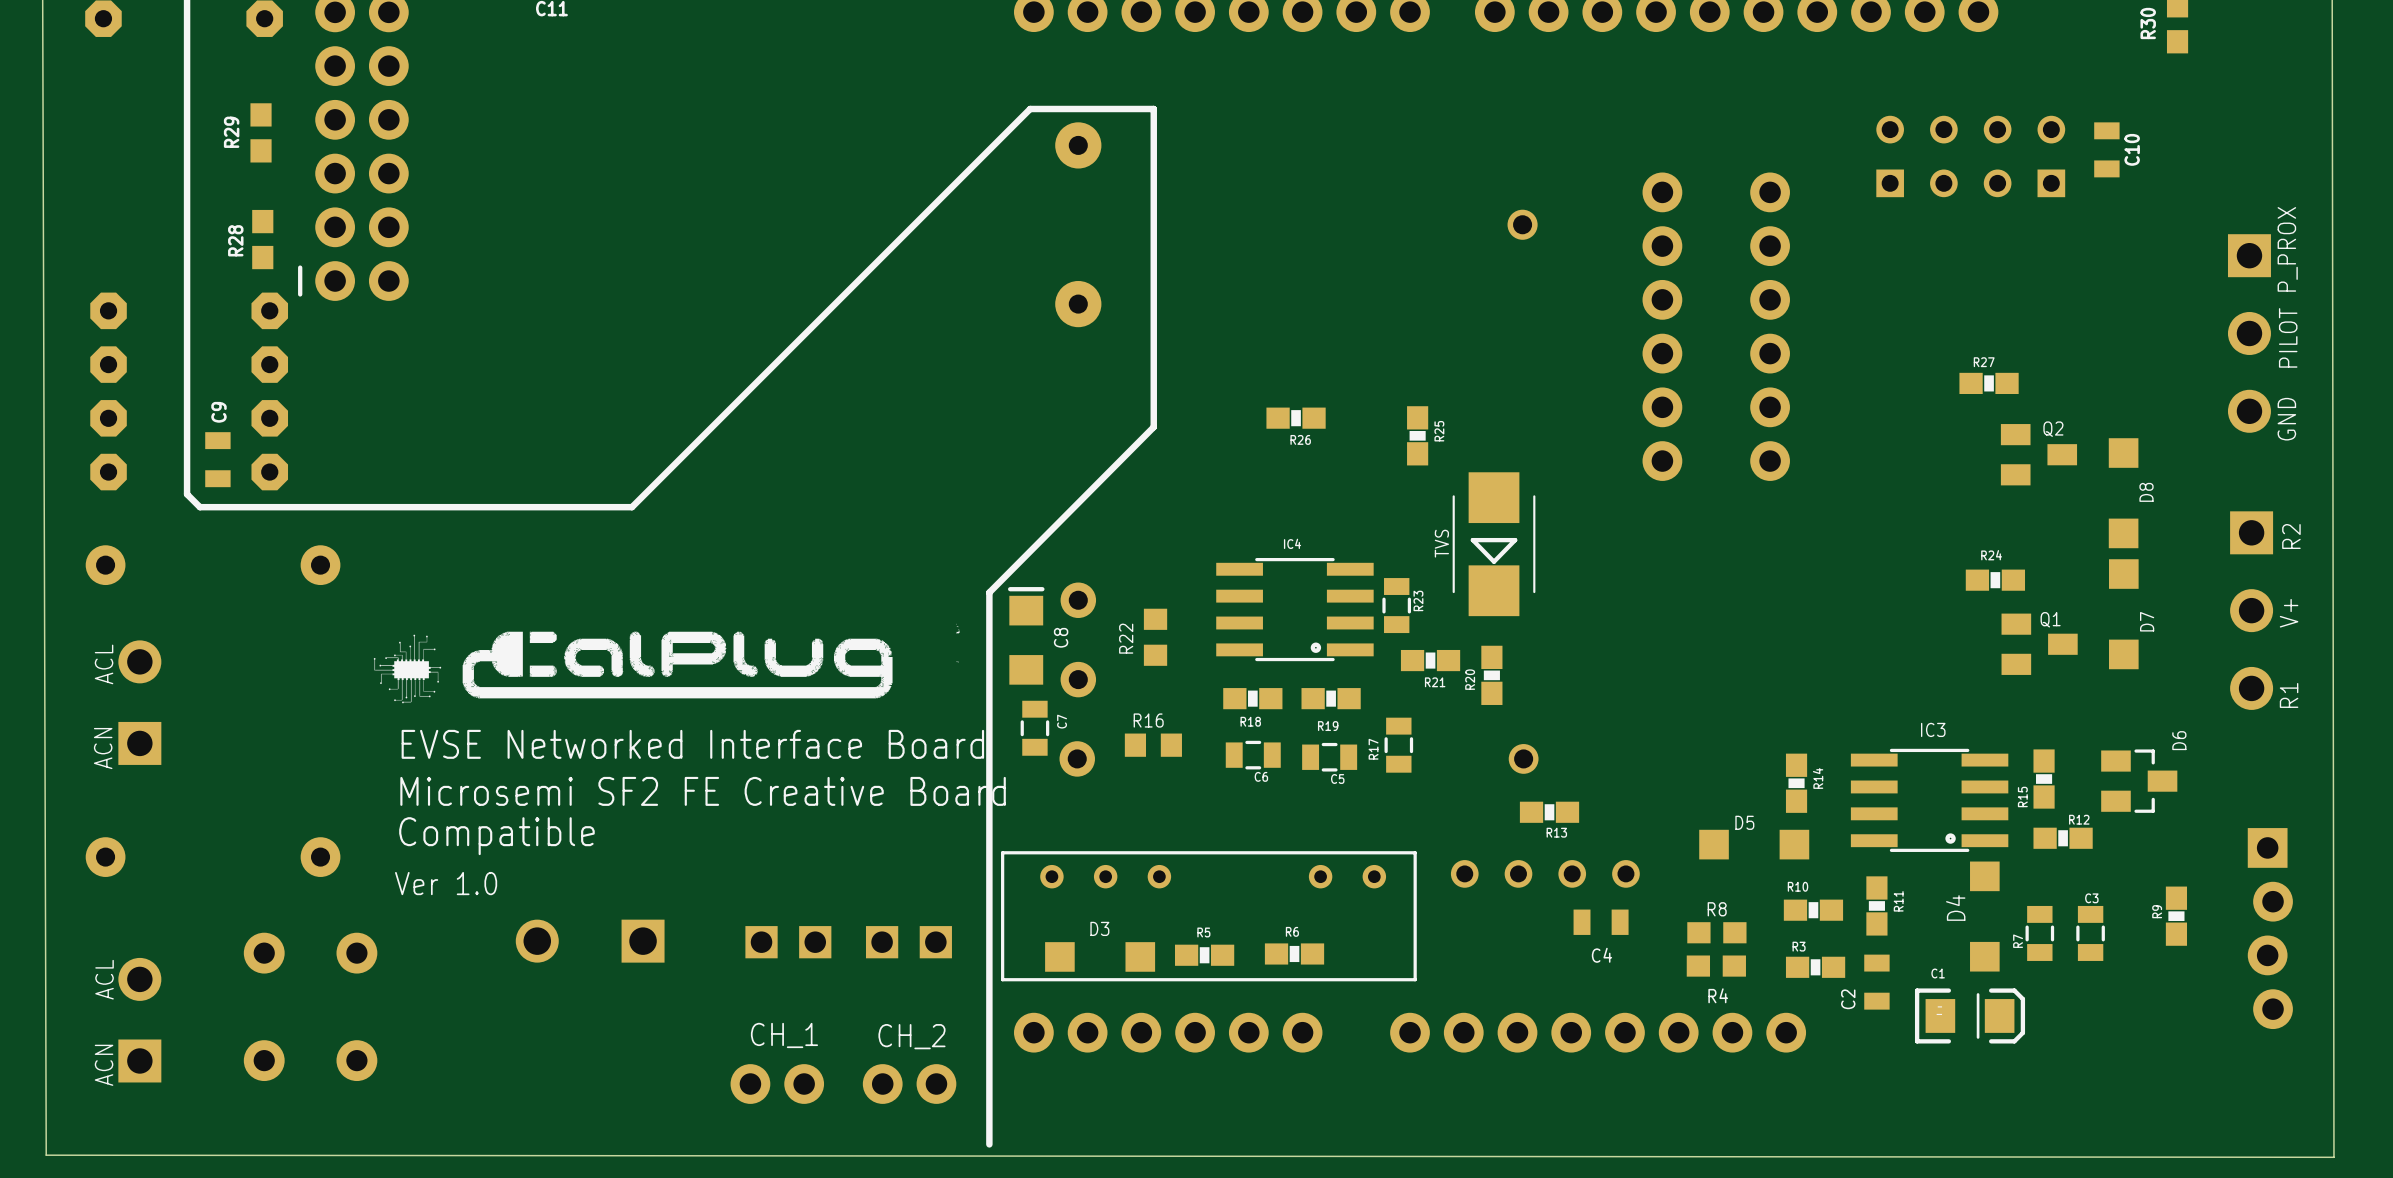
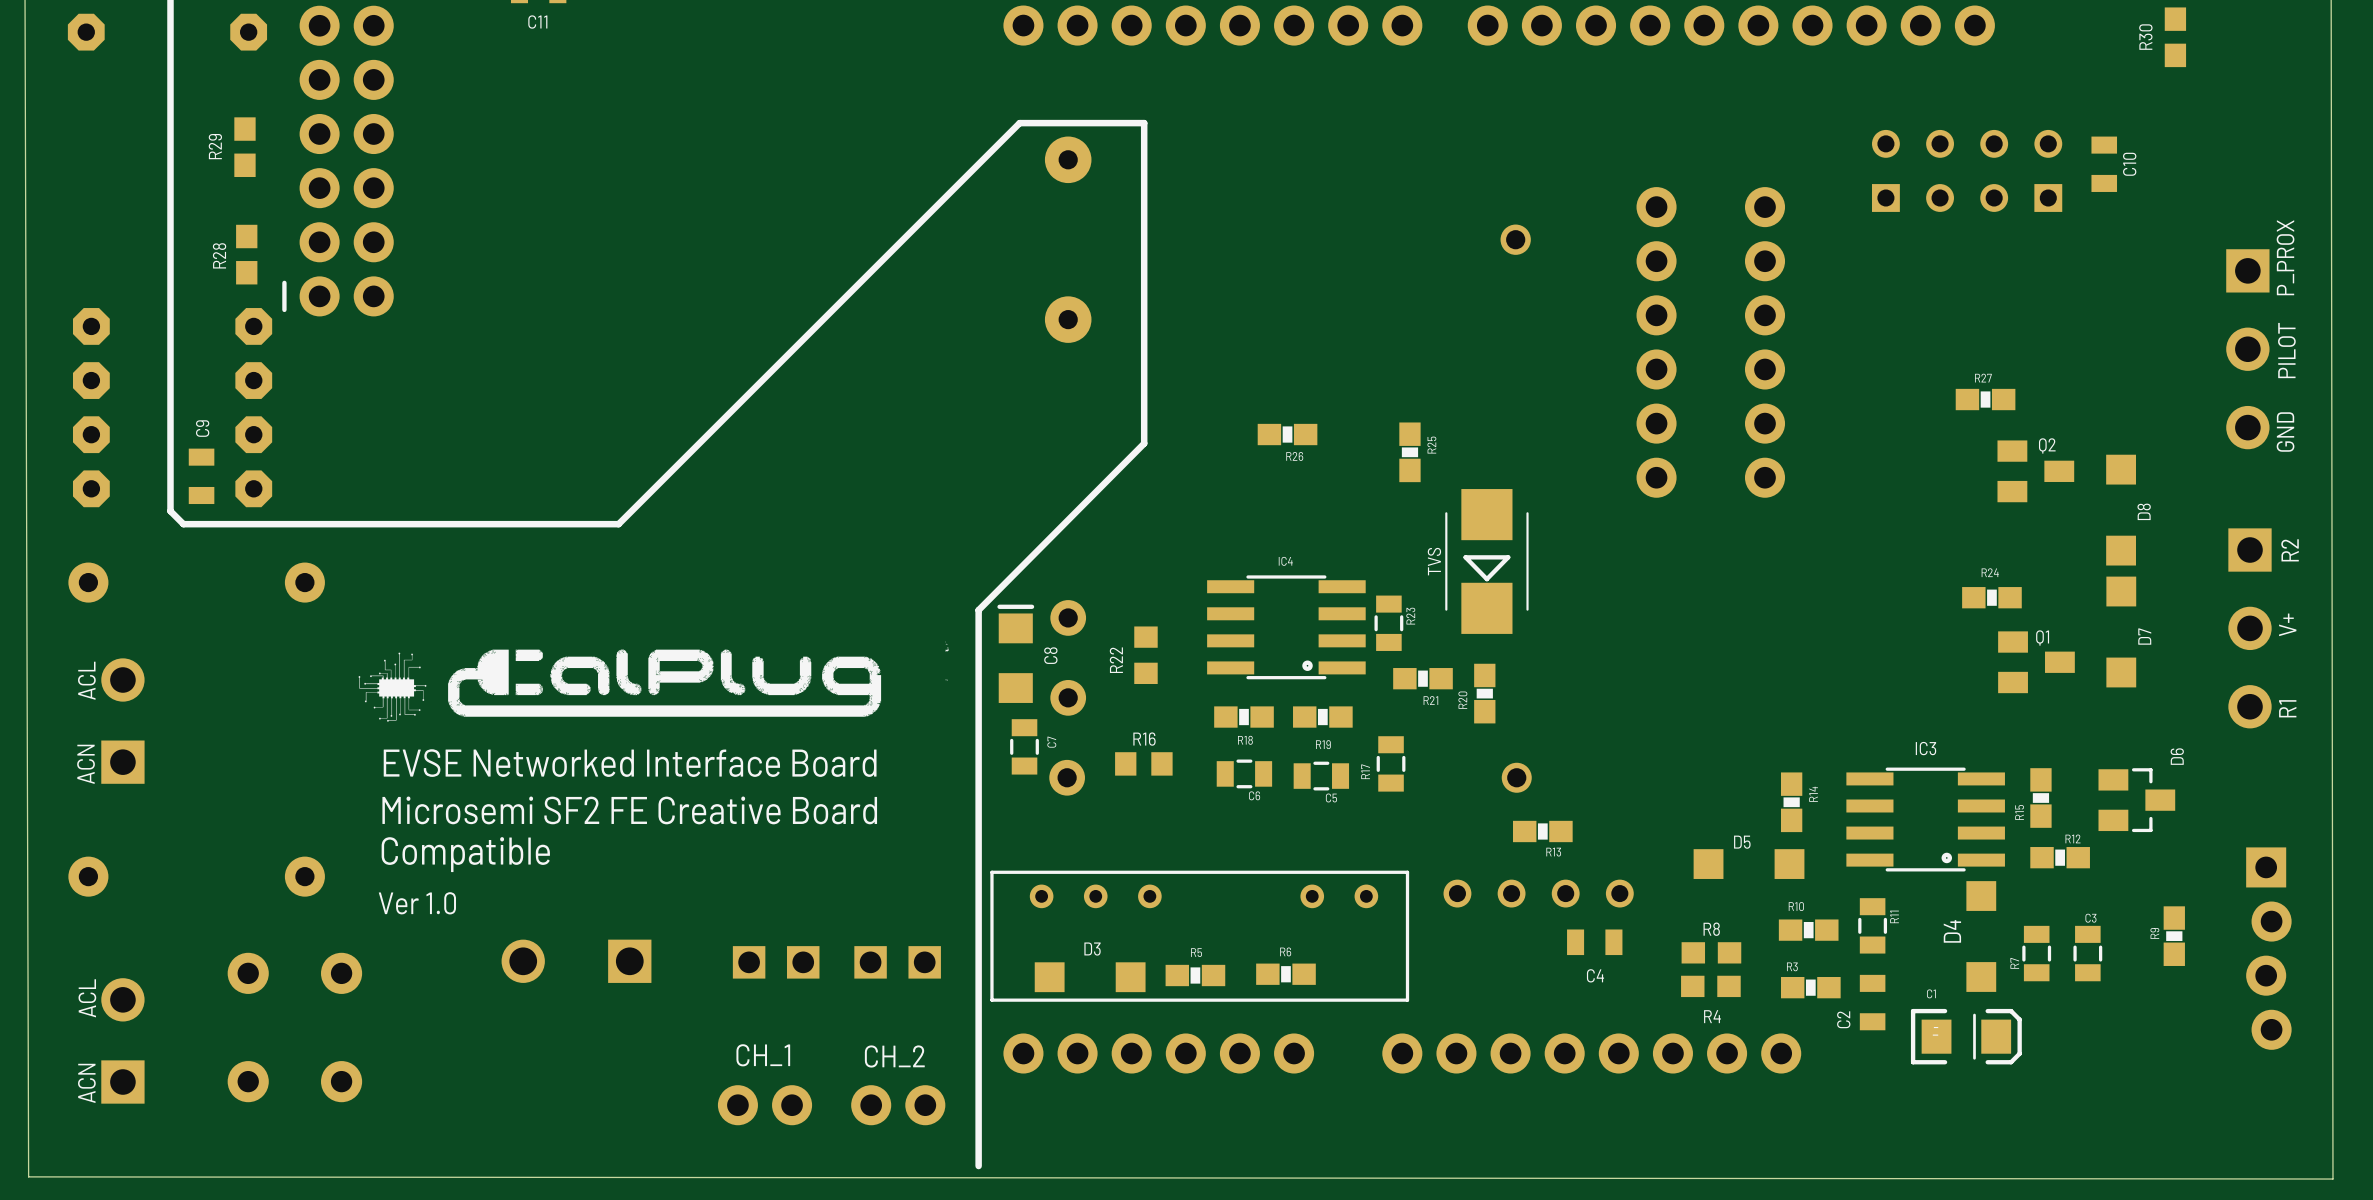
R11 footprint: [1866, 876, 1888, 936] -> [1858, 898, 1888, 954]

